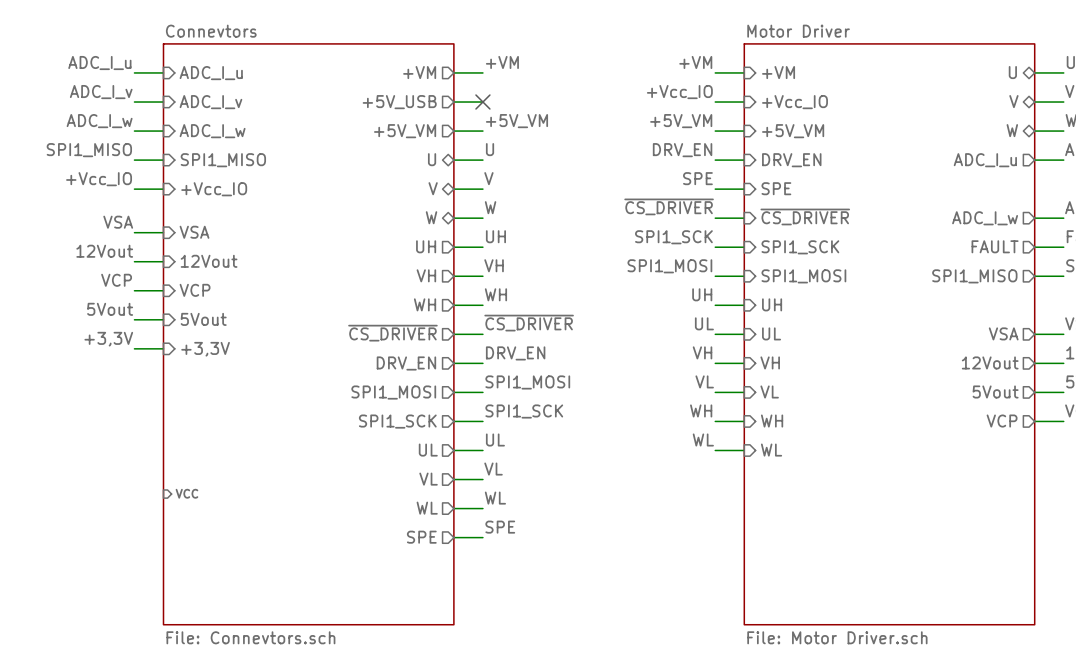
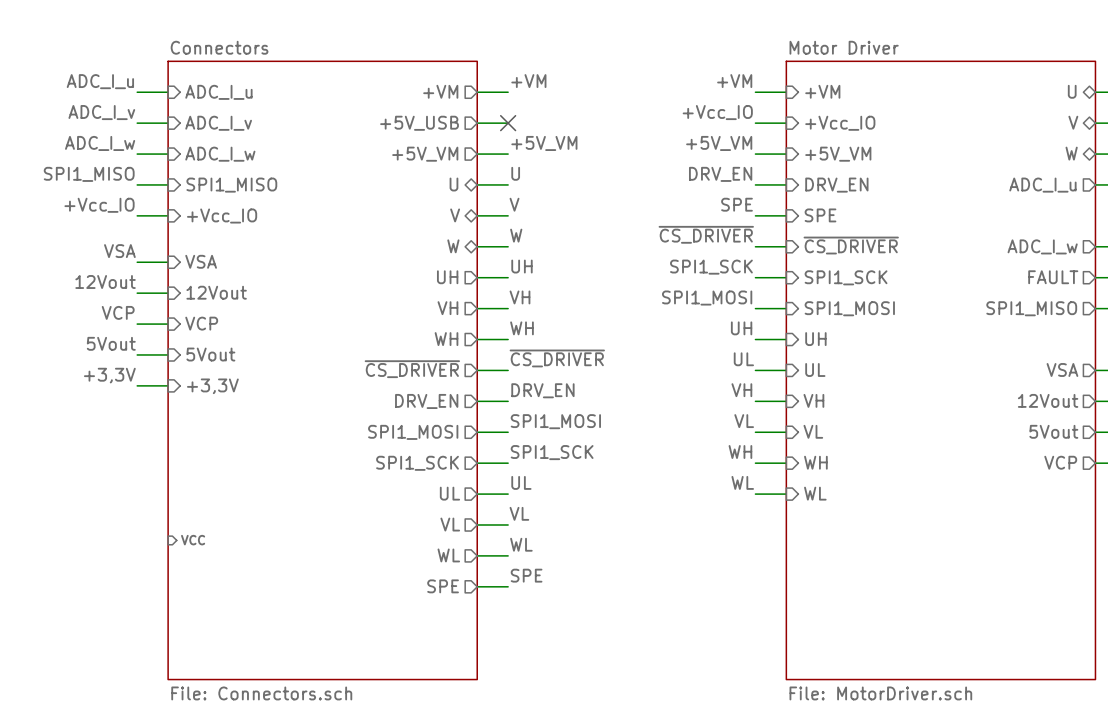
sheet Connevtors name: Connevtors (211, 31) -> Connectors (219, 47)
sheet Connevtors value: File: Connevtors.sch (250, 637) -> File: Connectors.sch (261, 693)
sheet Motor Driver value: File: Motor Driver.sch (837, 637) -> File: MotorDriver.sch (880, 693)

